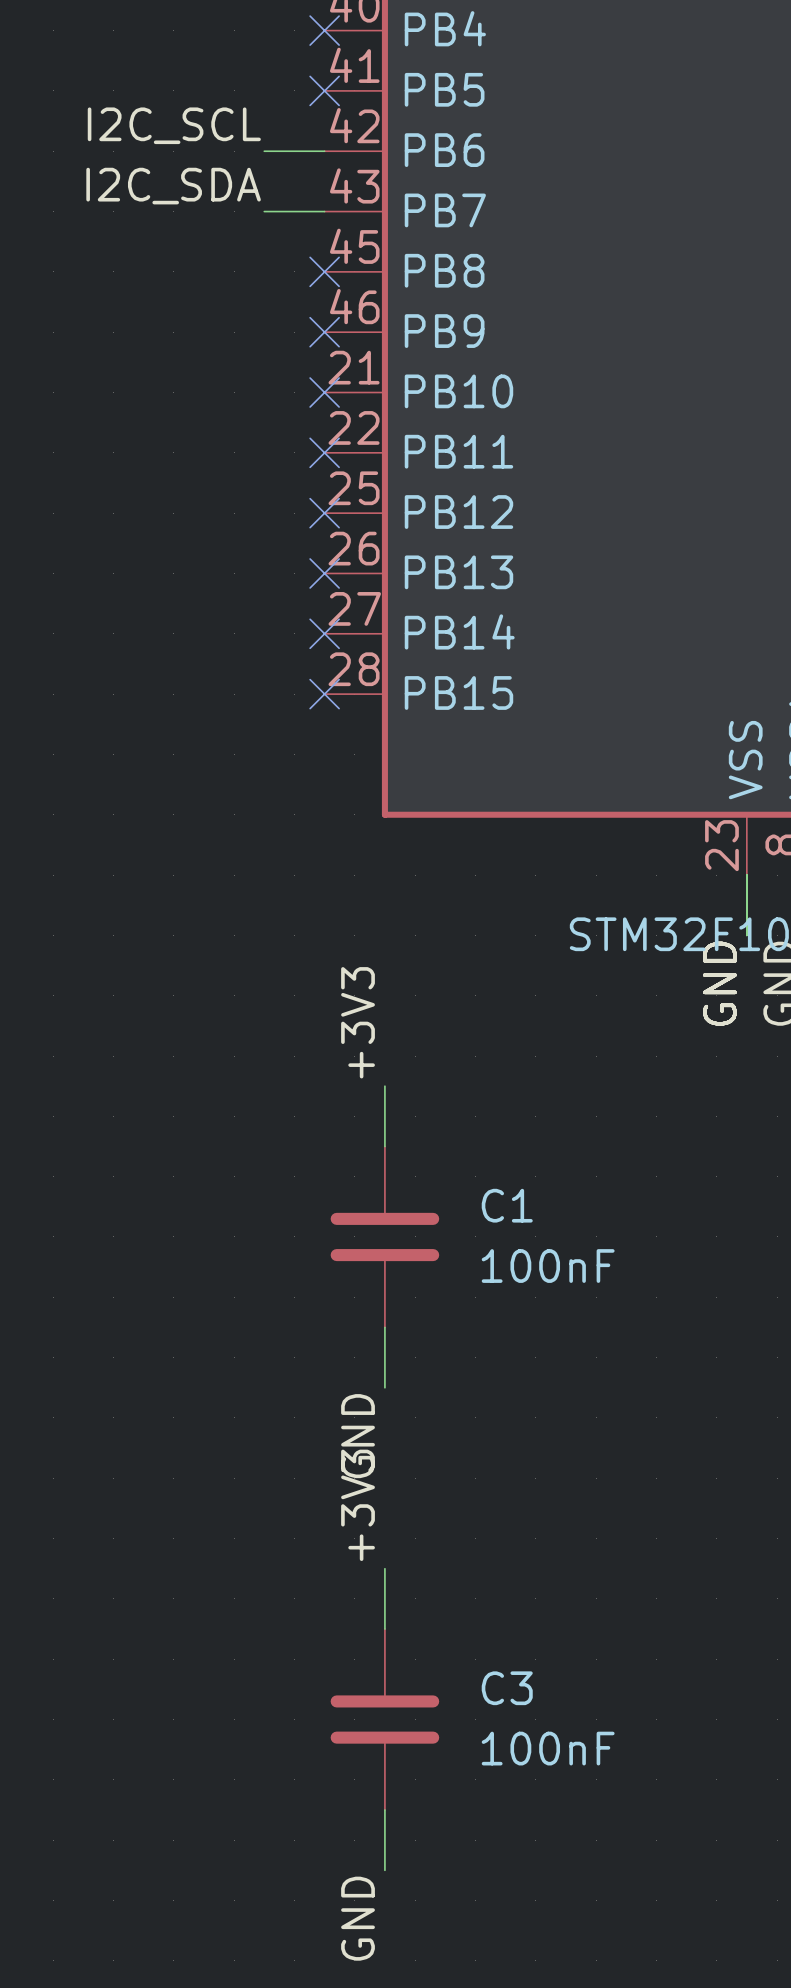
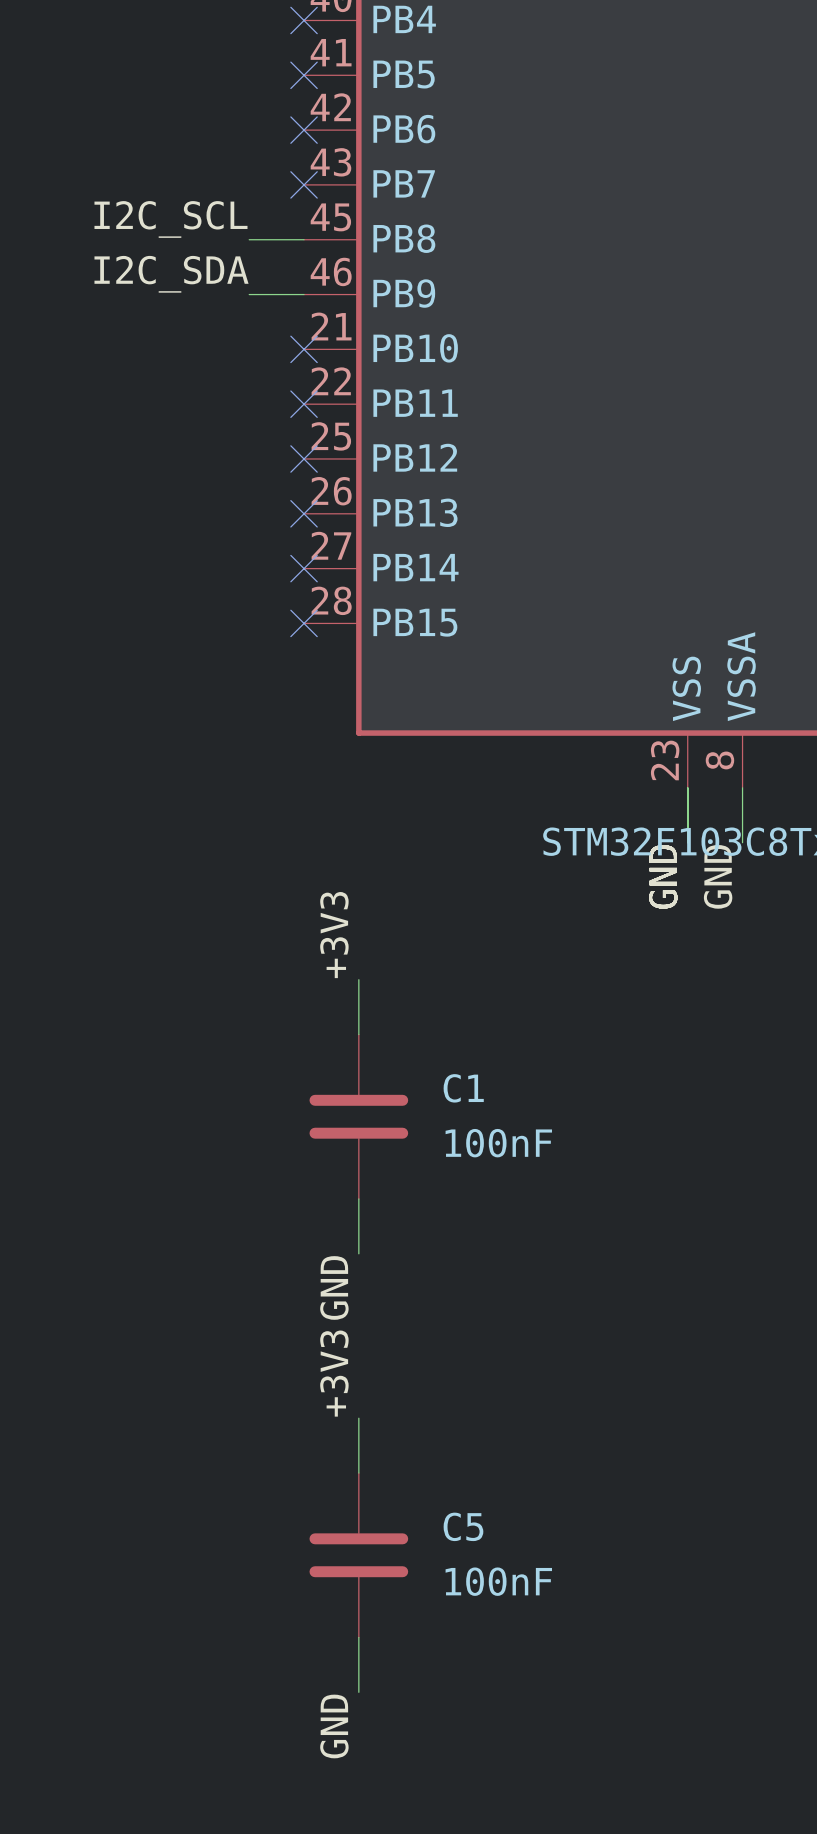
label position: I2C_SCL (174, 125) -> I2C_SCL (170, 219)
wire: (264, 151) (324, 151) -> (249, 239) (304, 239)
no-connect mark: none -> (304, 130)
label position: I2C_SDA (173, 186) -> I2C_SDA (171, 274)
wire: (264, 211) (324, 211) -> (249, 294) (304, 294)
no-connect mark: none -> (304, 184)
no-connect mark: (324, 271) -> none
no-connect mark: (324, 332) -> none
C3 name: C3 (507, 1688) -> C5 (463, 1526)

